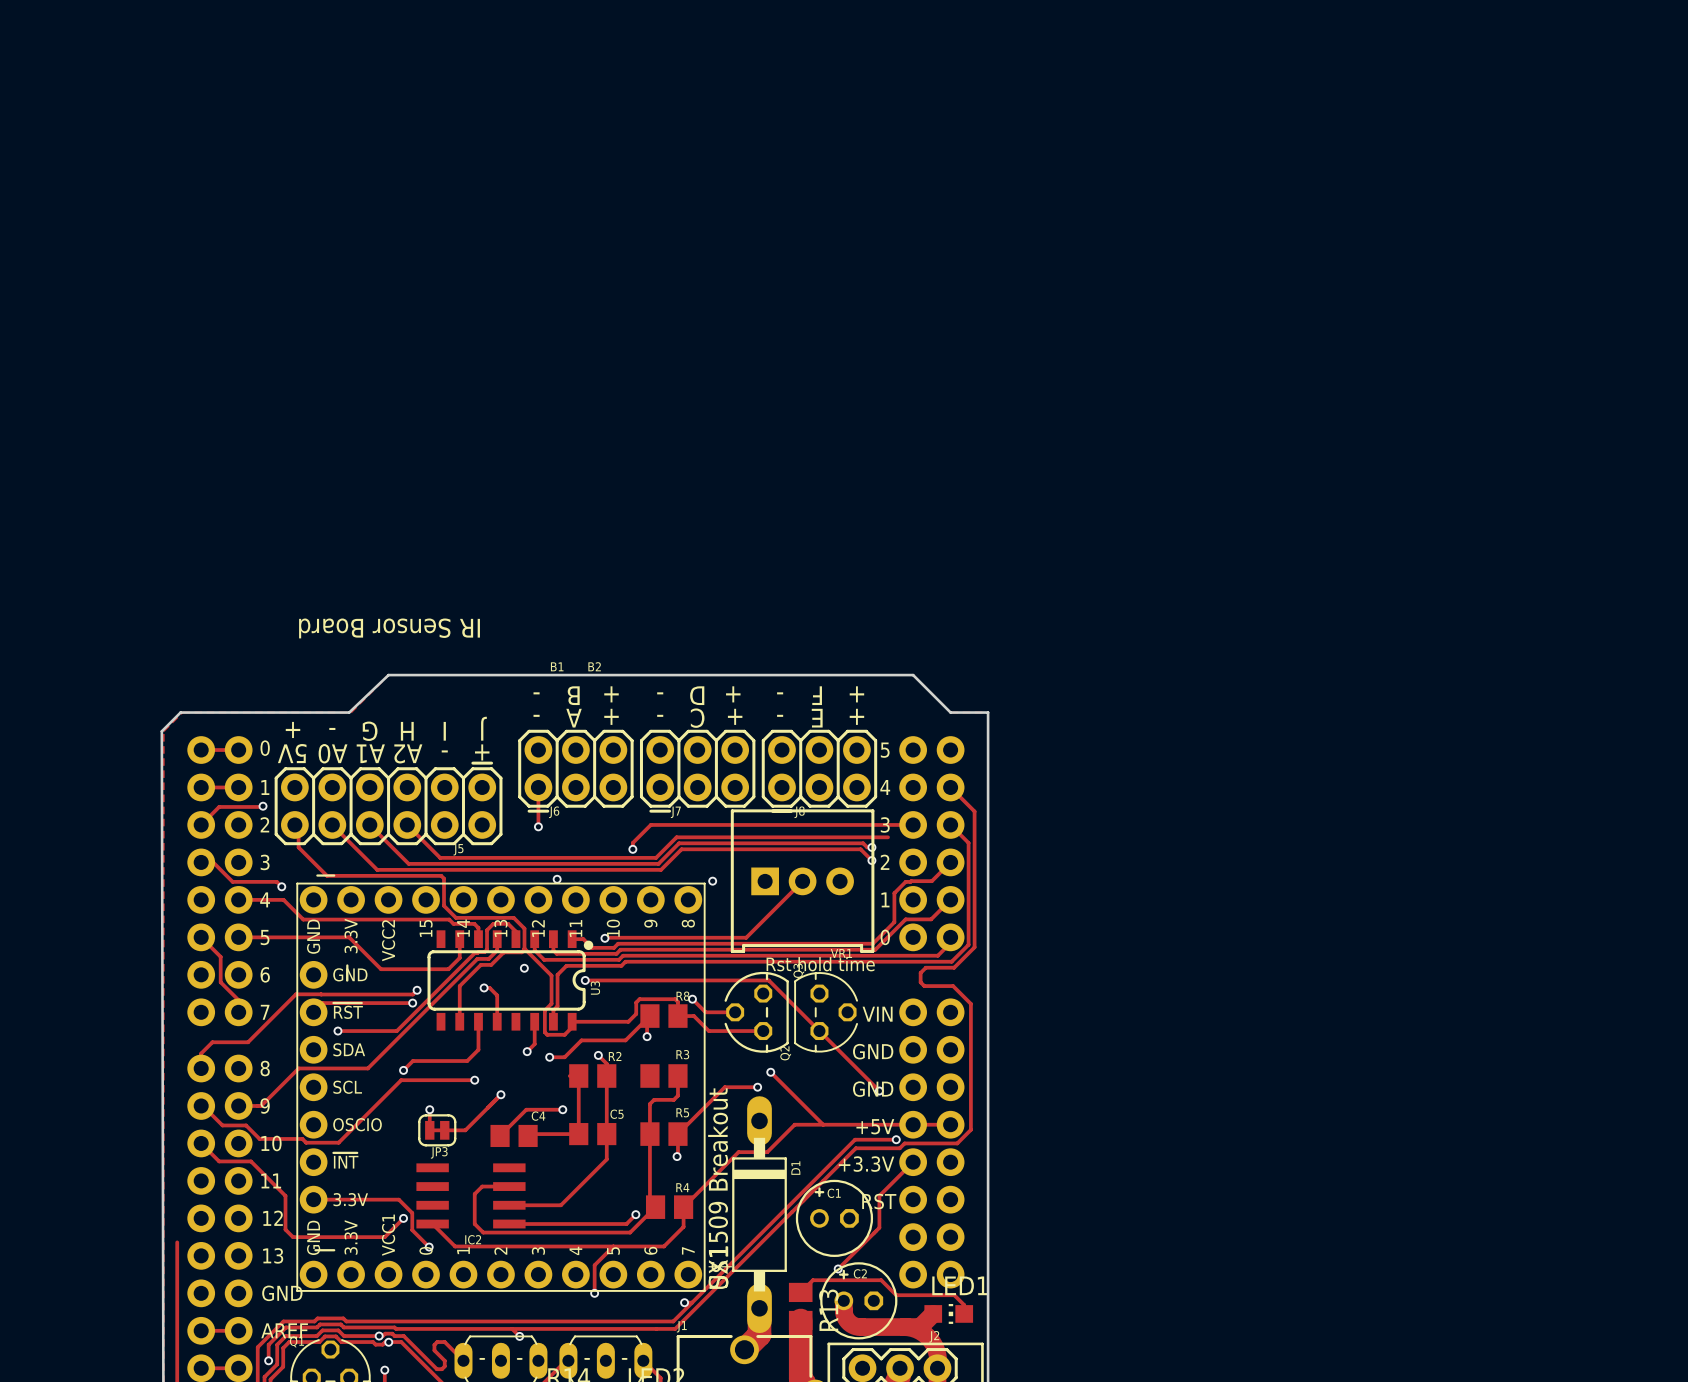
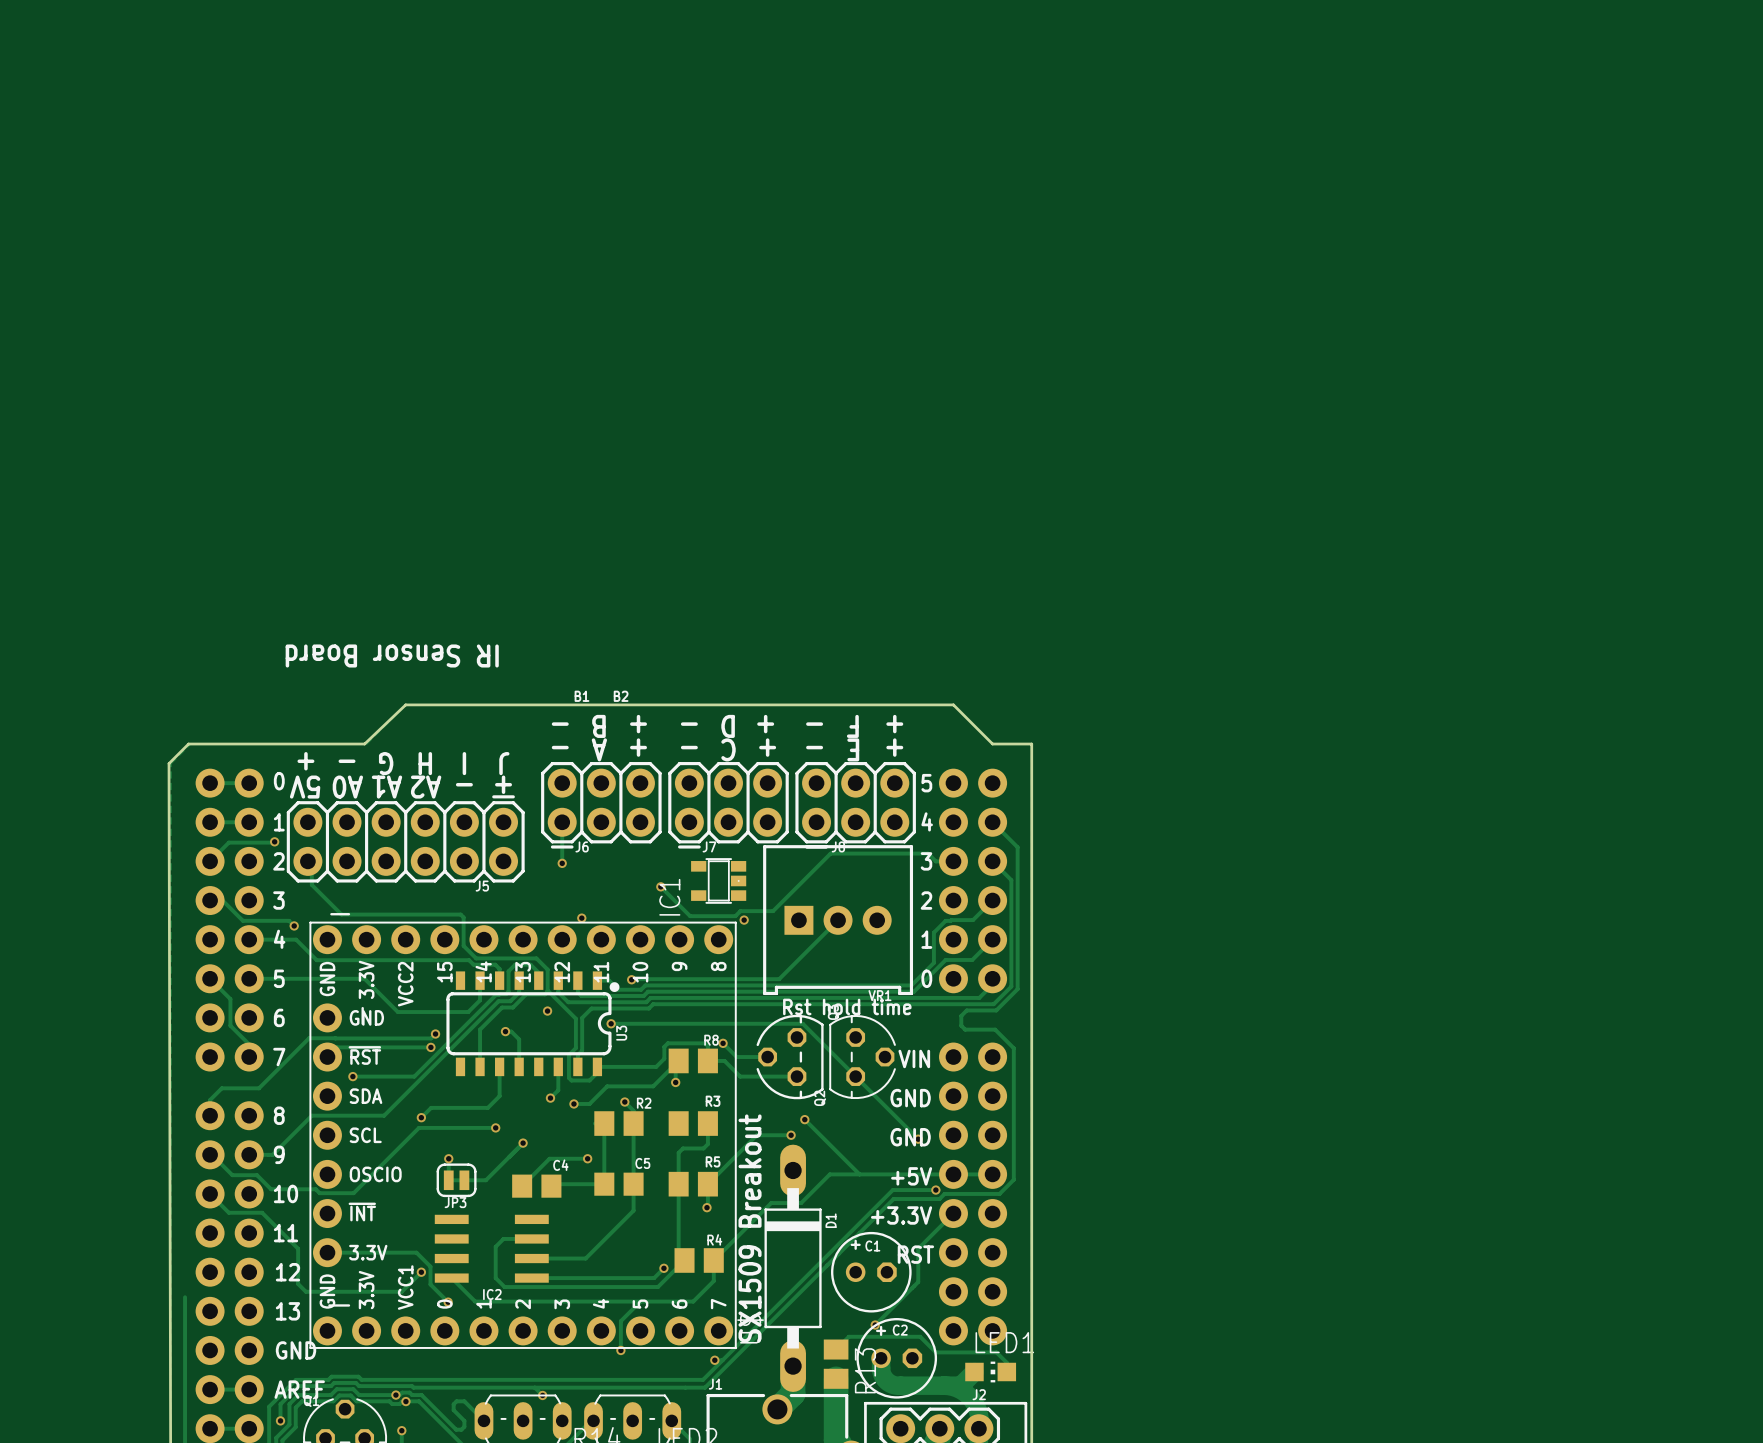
track: (332, 824) (377, 869) (661, 869) (681, 849) (860, 849) (871, 860) -> none
track: (369, 824) (408, 863) (658, 863) (679, 843) (863, 843) (867, 847) (871, 847) -> none
track: (407, 824) (440, 857) (656, 857) (676, 837) (888, 837) -> none
track: (896, 824) (650, 824) (632, 842) (632, 849) -> (935, 861) (928, 853) (830, 853) (773, 911) (740, 911) (735, 916) (690, 916) (660, 886)
IC1: none -> (718, 880)
via: (871, 847) -> none
via: (871, 860) -> none

